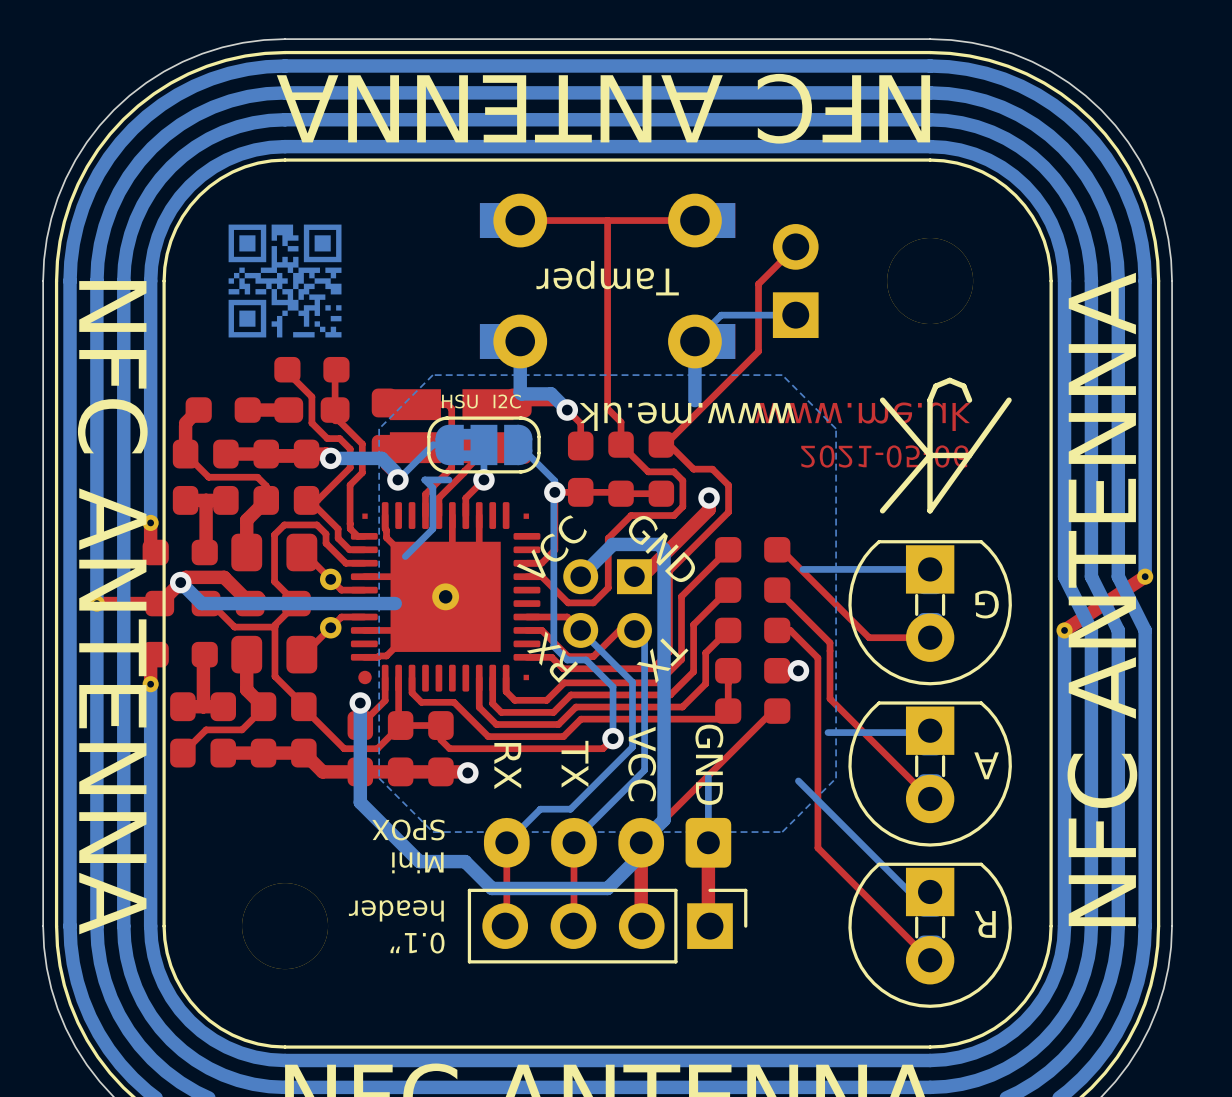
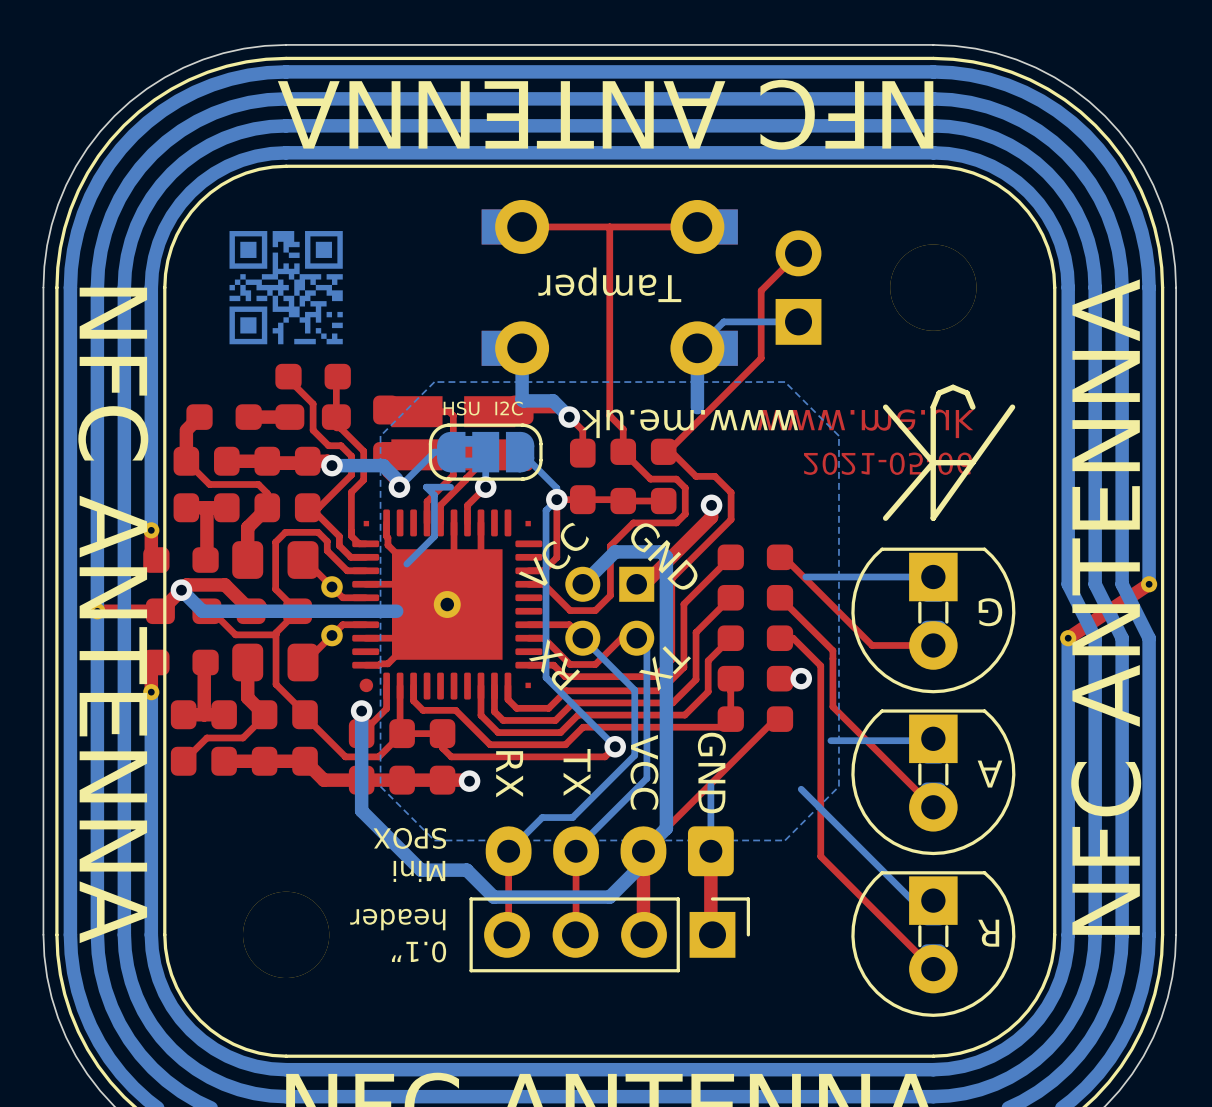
bottom track: (553, 493) (553, 646) (567, 660) (586, 660) (613, 686) (613, 738) -> (555, 500) (546, 510) (546, 677) (615, 746)

